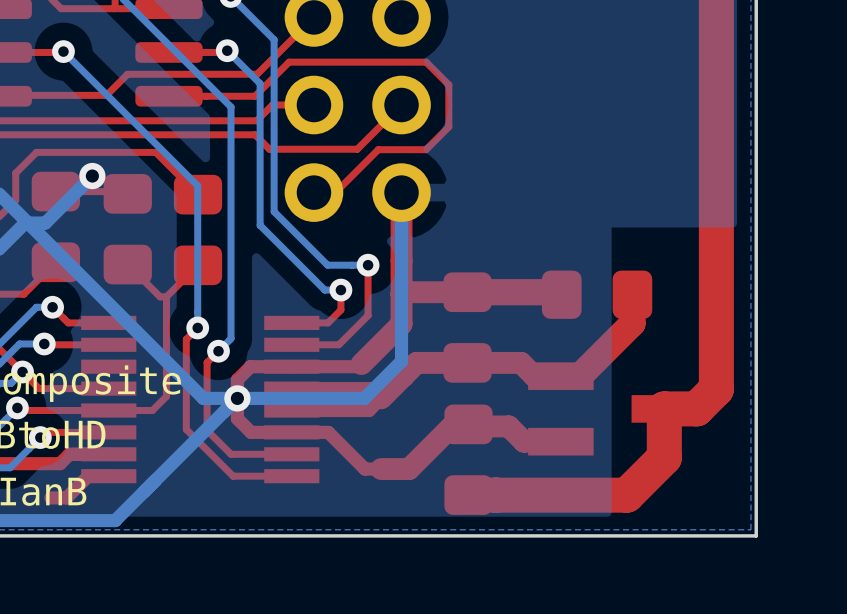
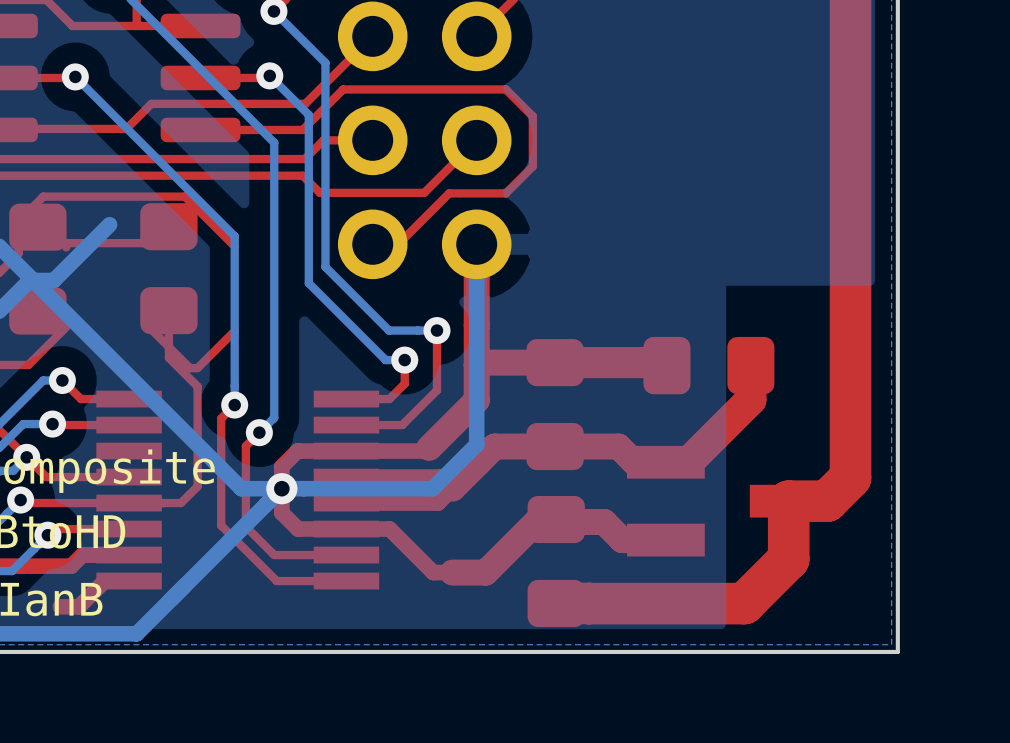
via: (92, 176) -> none
part position: (55, 226) -> (37, 269)
part position: (127, 229) -> (168, 268)
part: (198, 229) -> none
top track: (166, 296) (166, 312) -> (168, 310) (168, 357) (197, 386)

